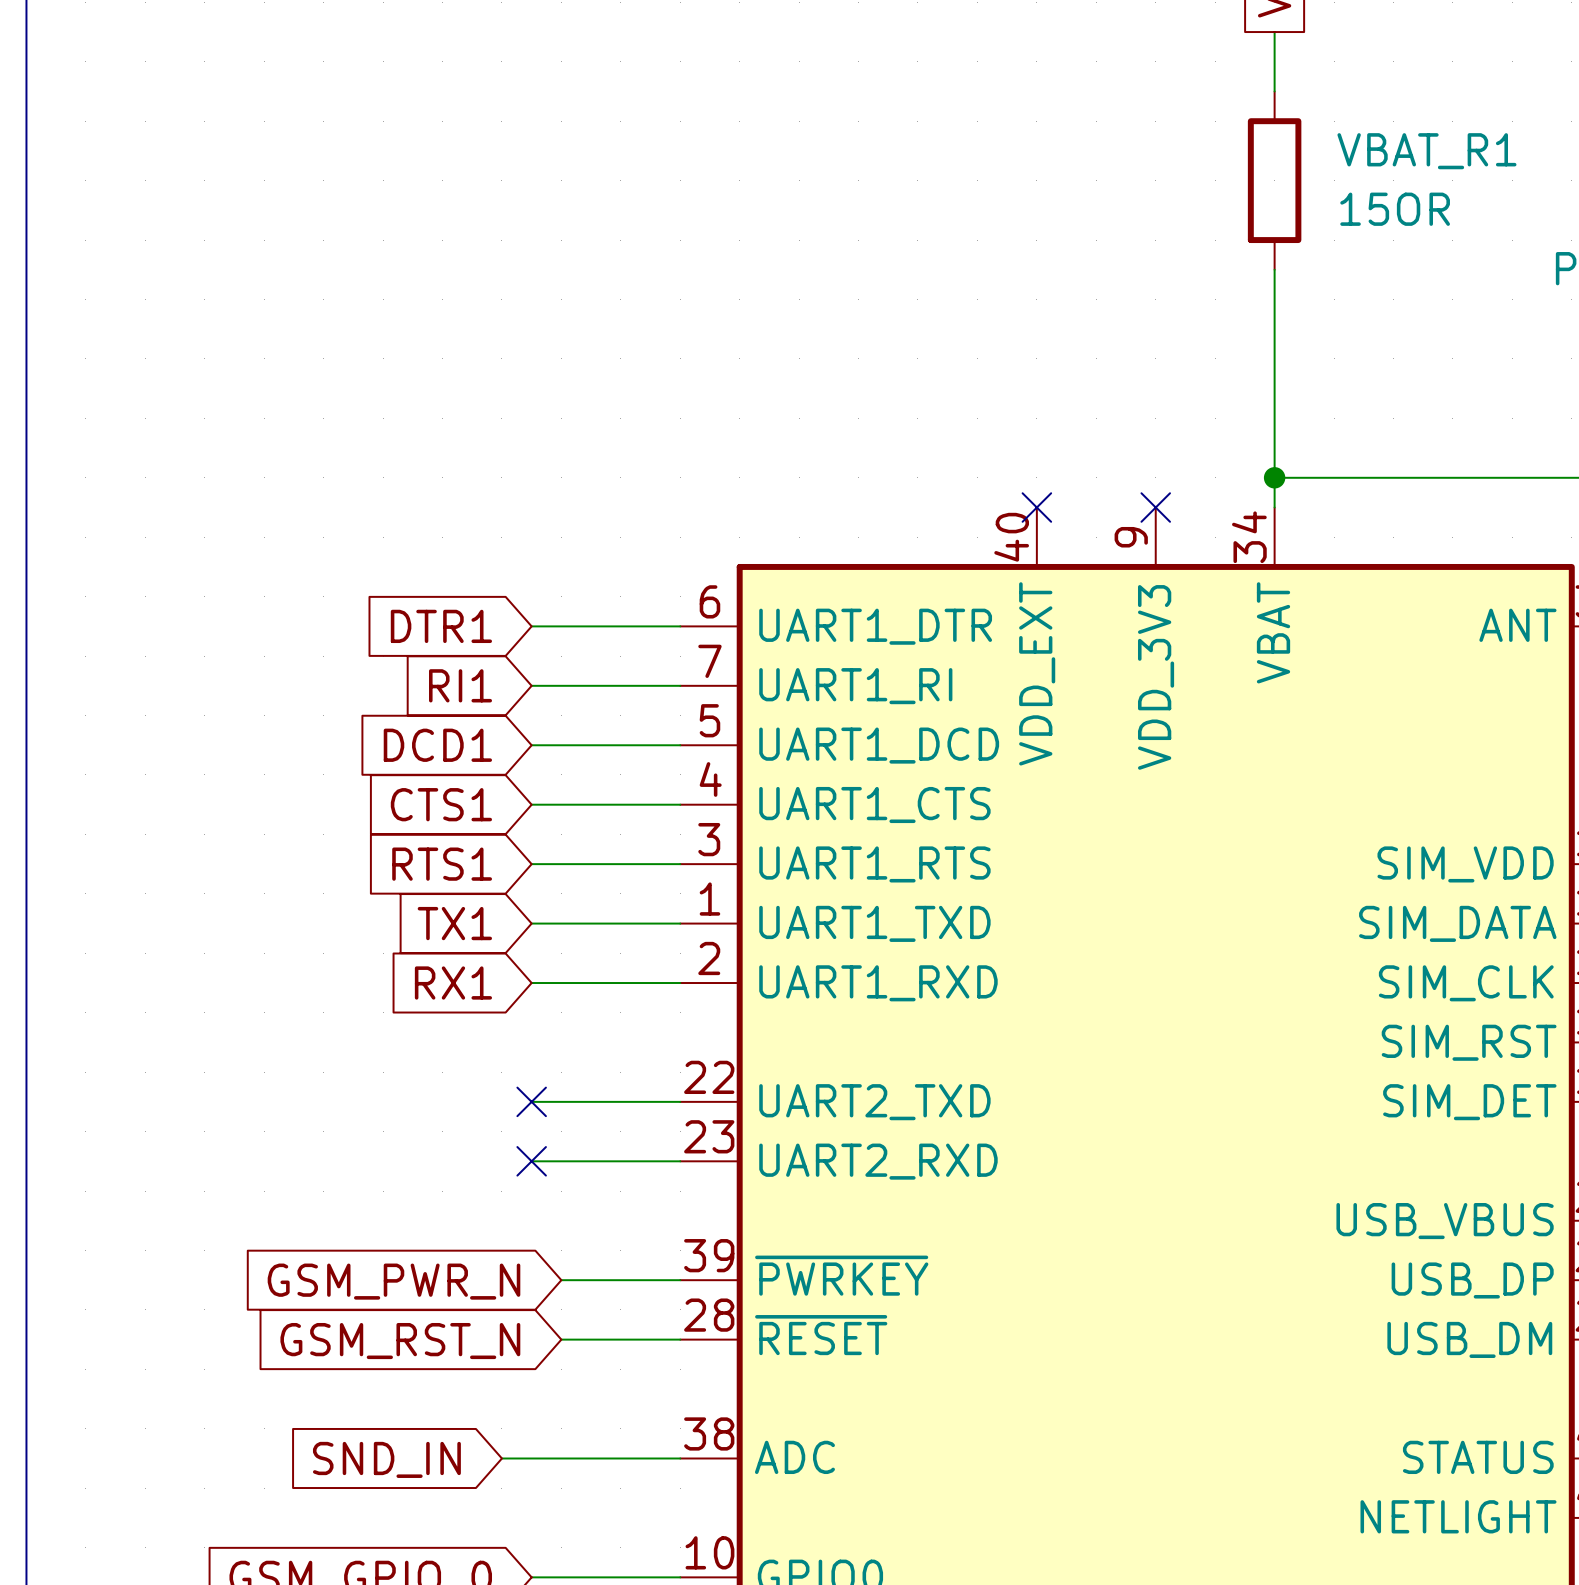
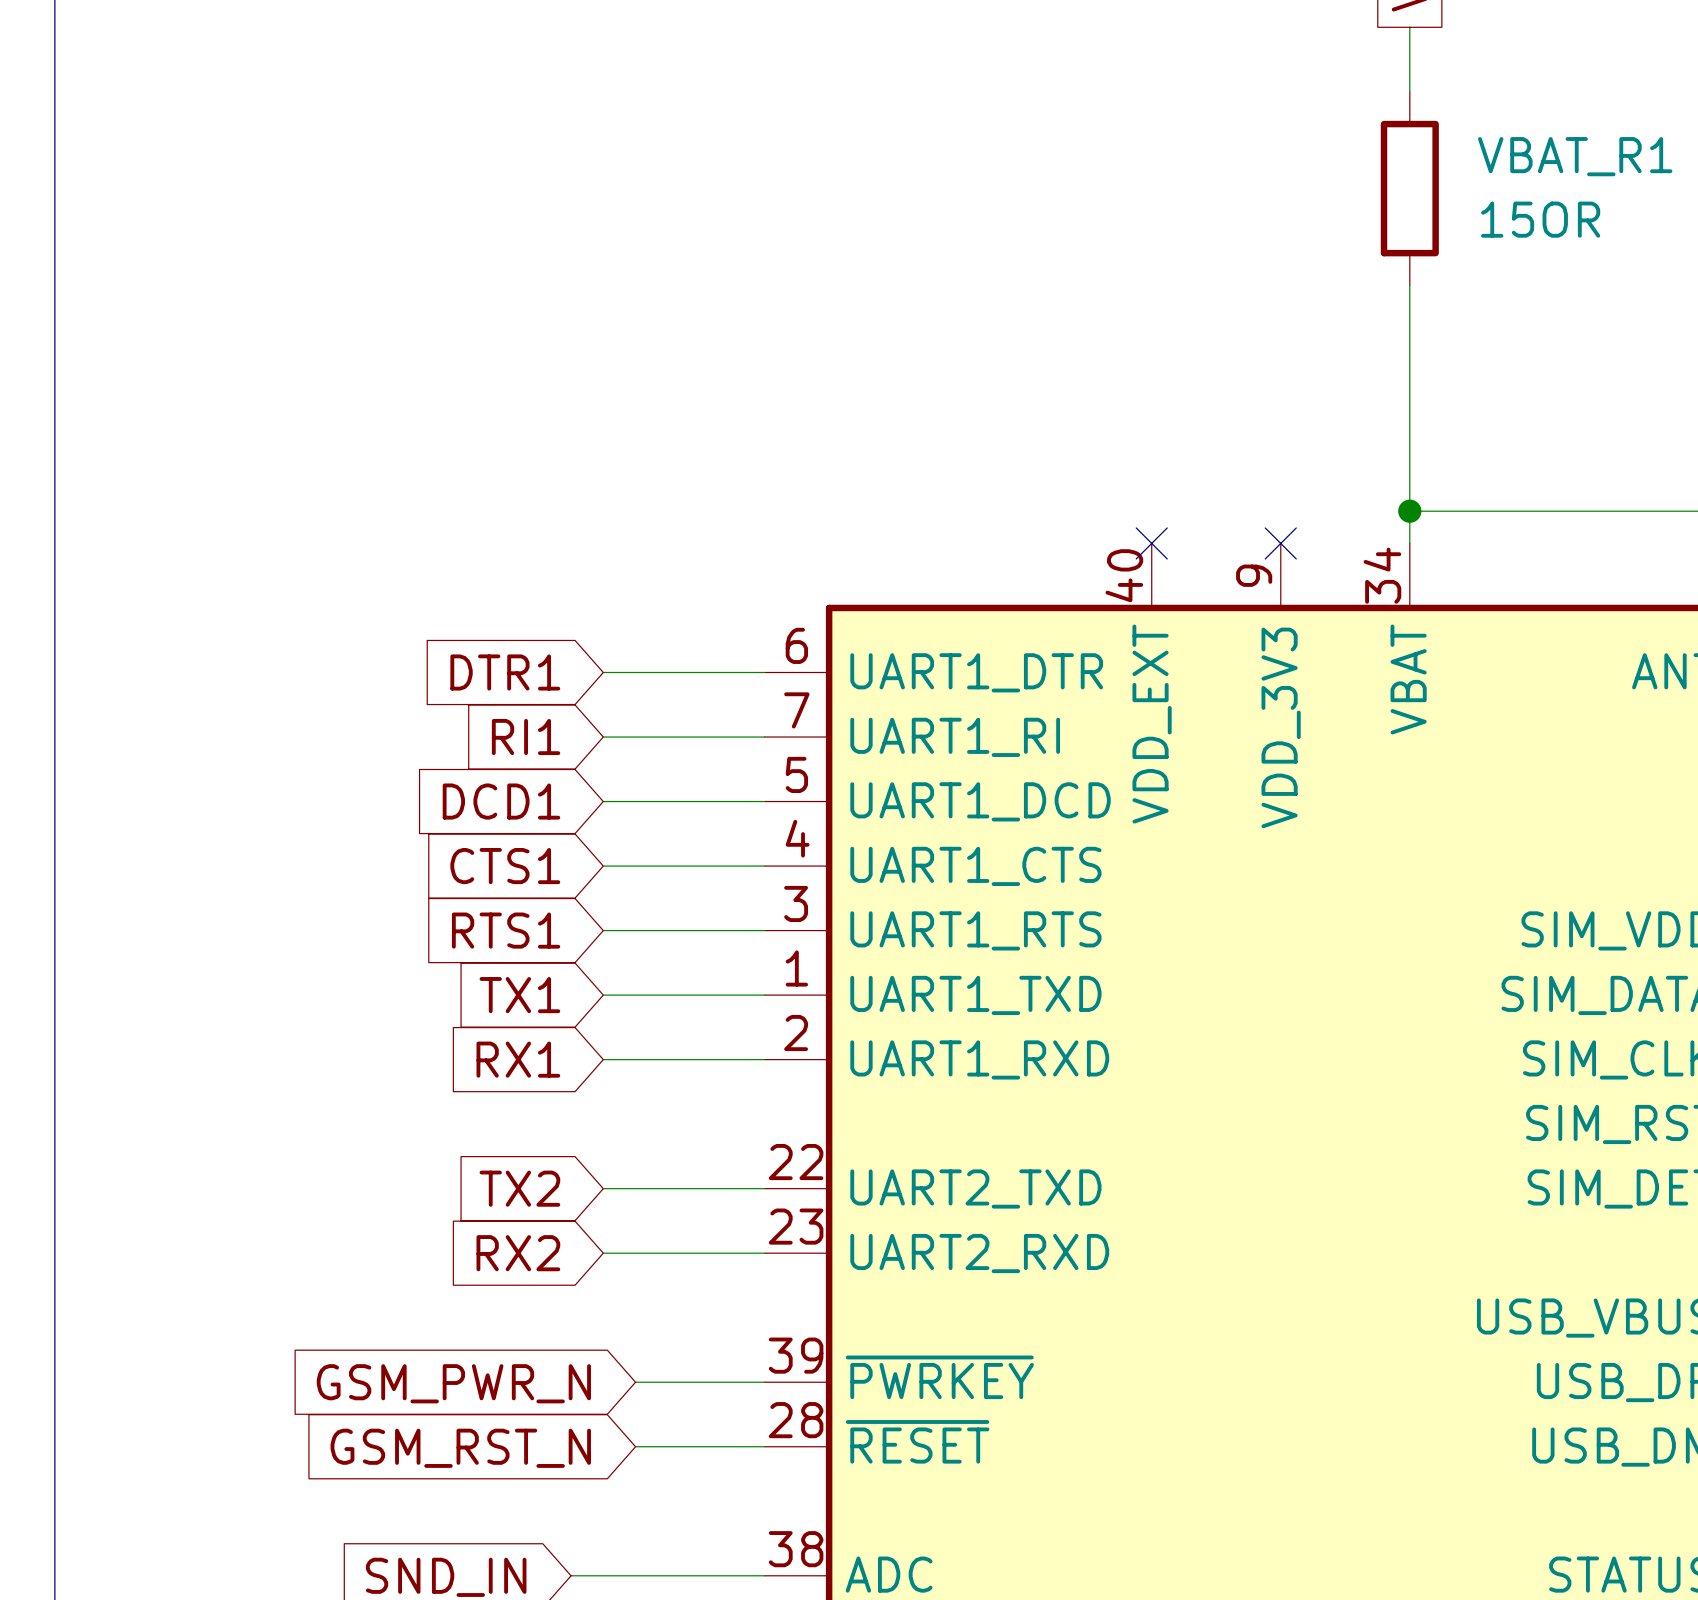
global label: none -> TX2 (519, 1188)
no-connect mark: (531, 1101) -> none
global label: none -> RX2 (518, 1253)
no-connect mark: (531, 1161) -> none

